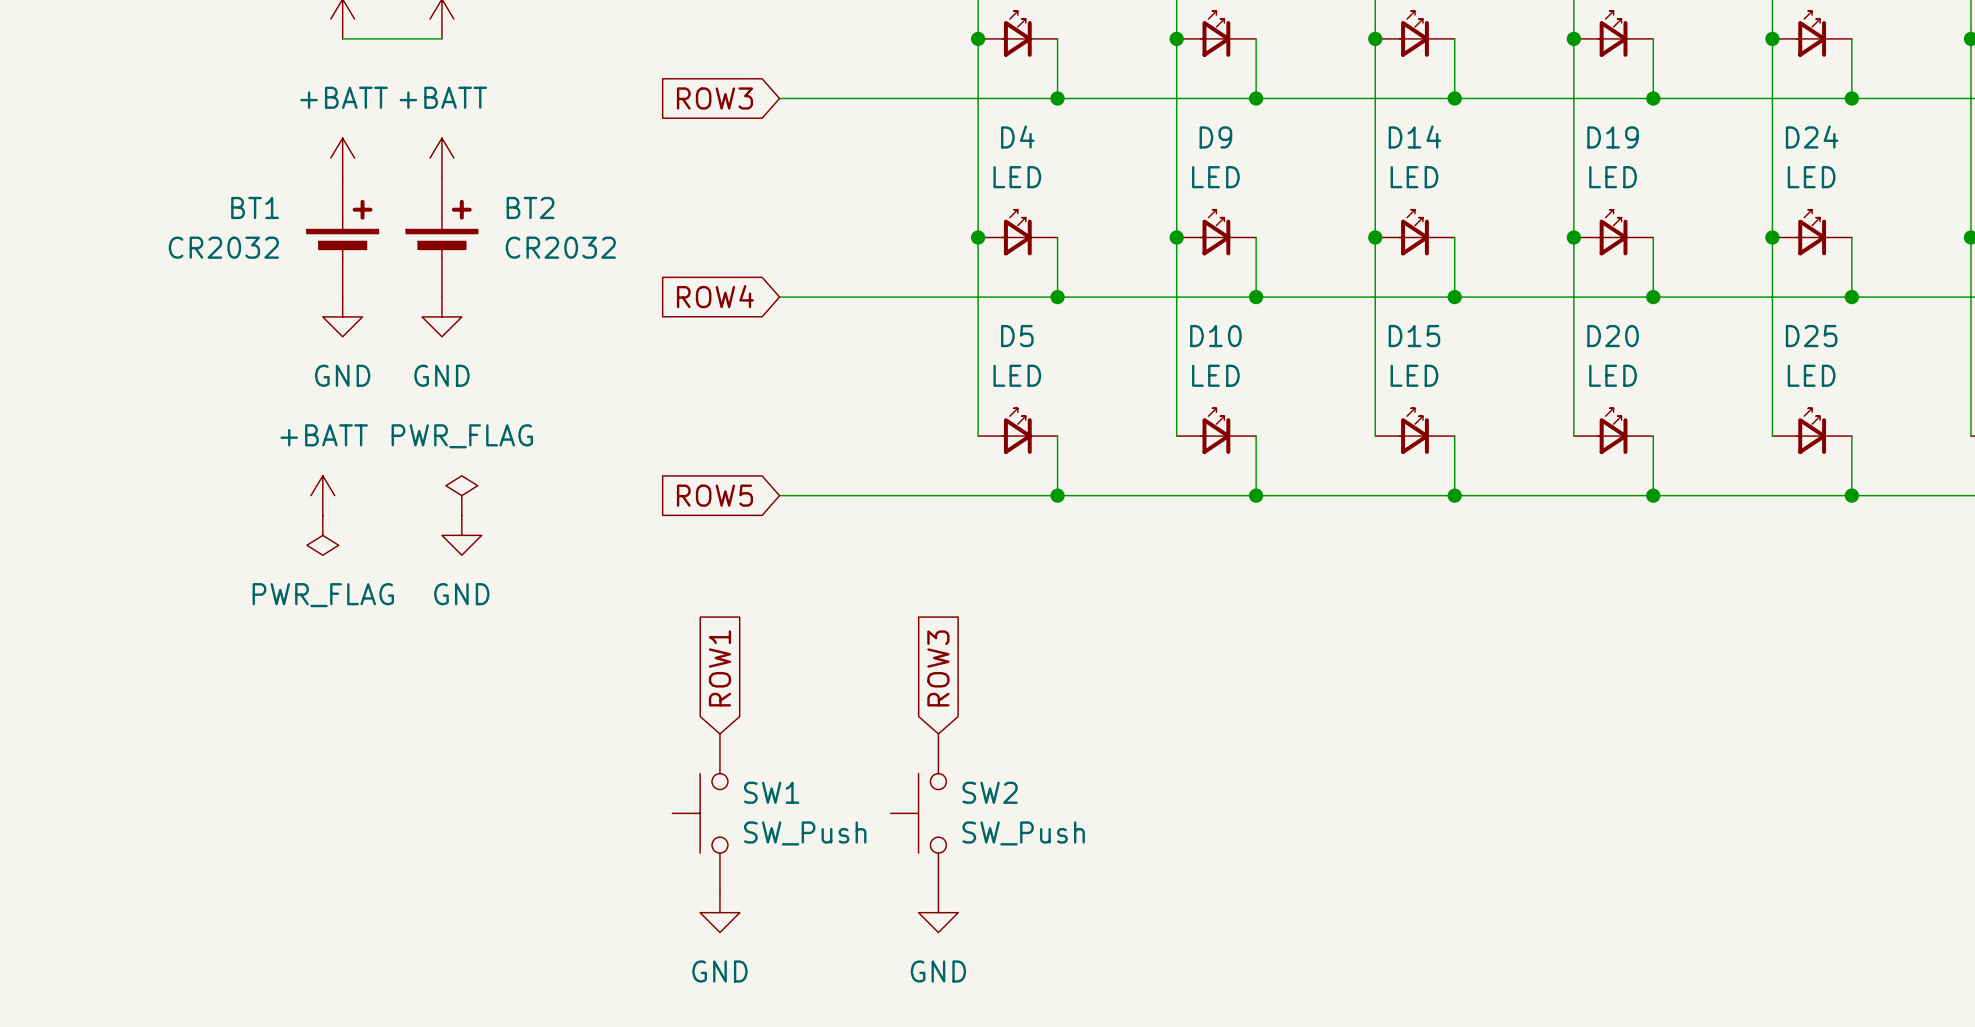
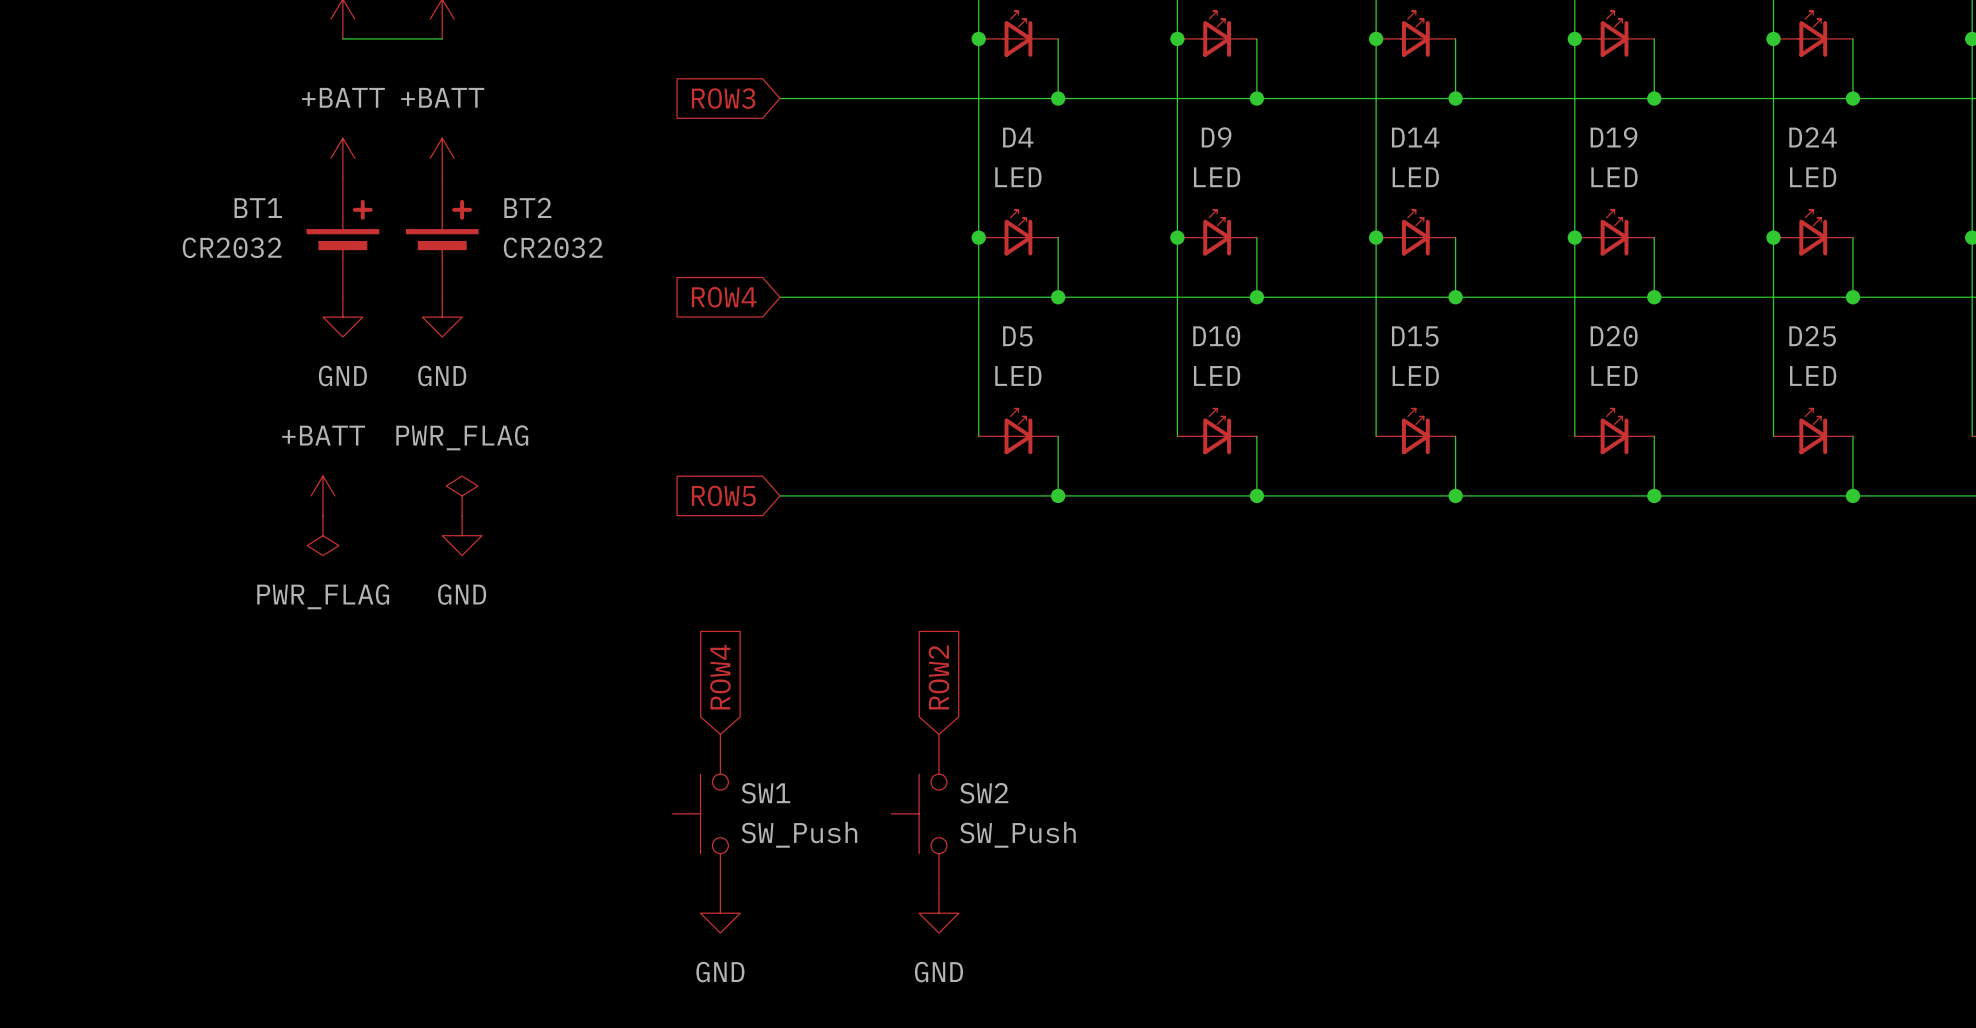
global label: ROW1 (719, 668) -> ROW4 (720, 677)
global label: ROW3 (938, 668) -> ROW2 (938, 677)

